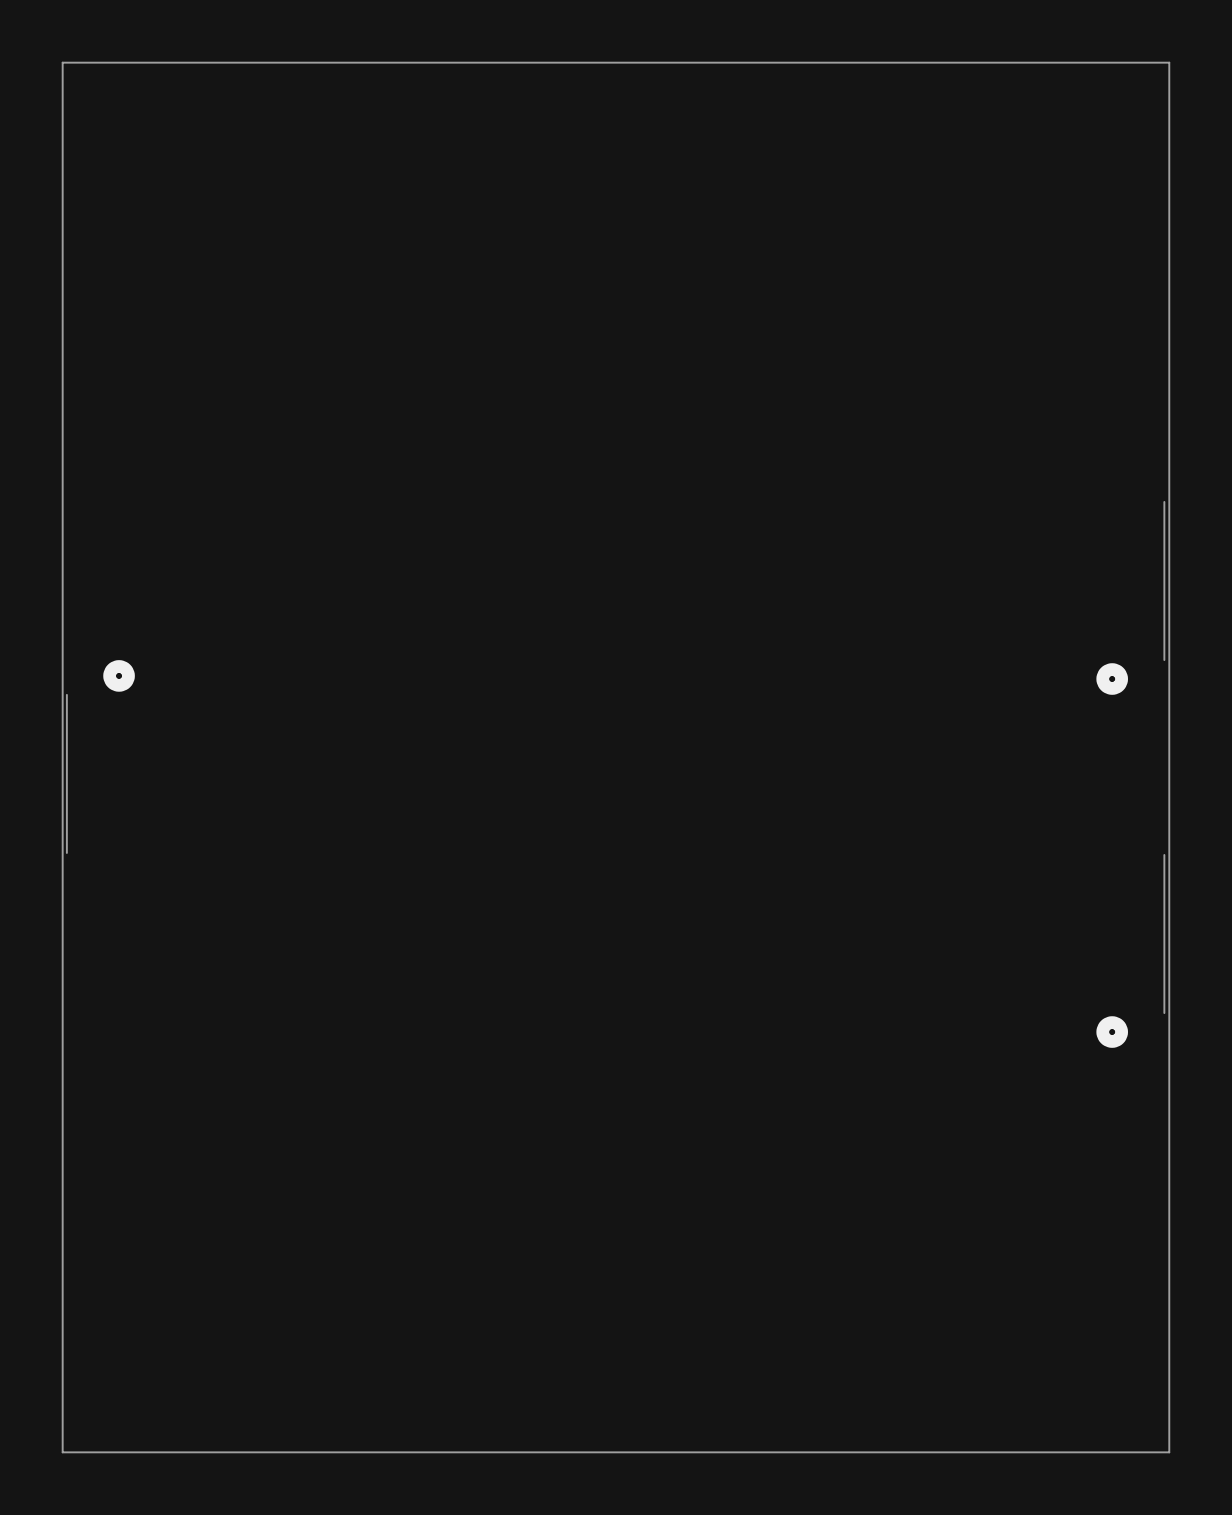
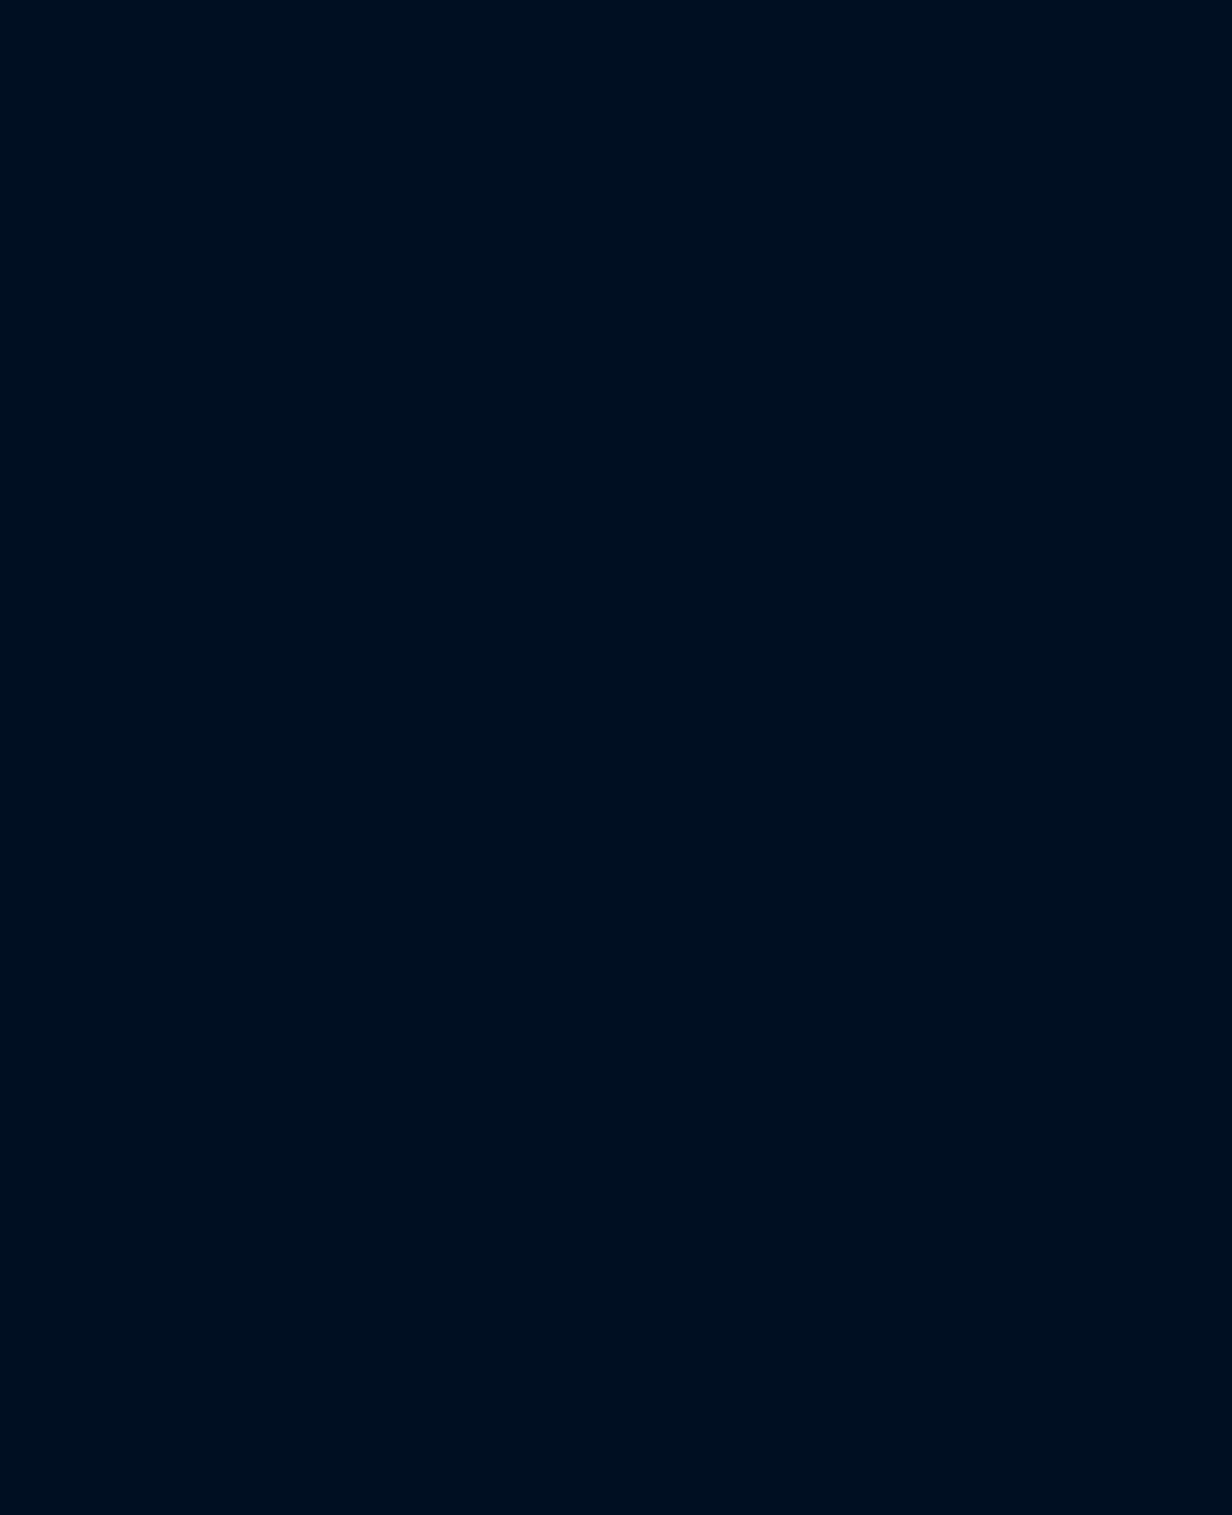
board edge: (1169, 62) (1169, 1452) (62, 1452) (62, 62) (1169, 62) -> none
part: (1130, 598) -> none
part: (100, 756) -> none
part: (1130, 951) -> none

